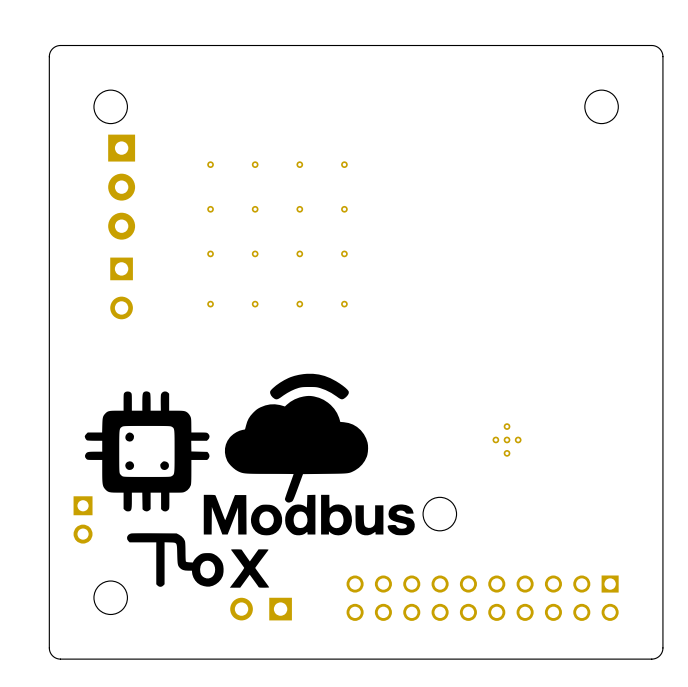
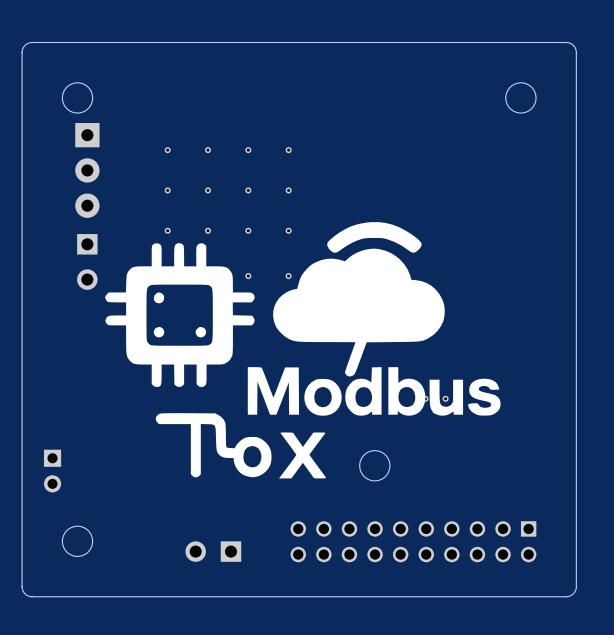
drawing: none -> [105, 222, 501, 479]
drawing: [84, 373, 415, 588] -> none

